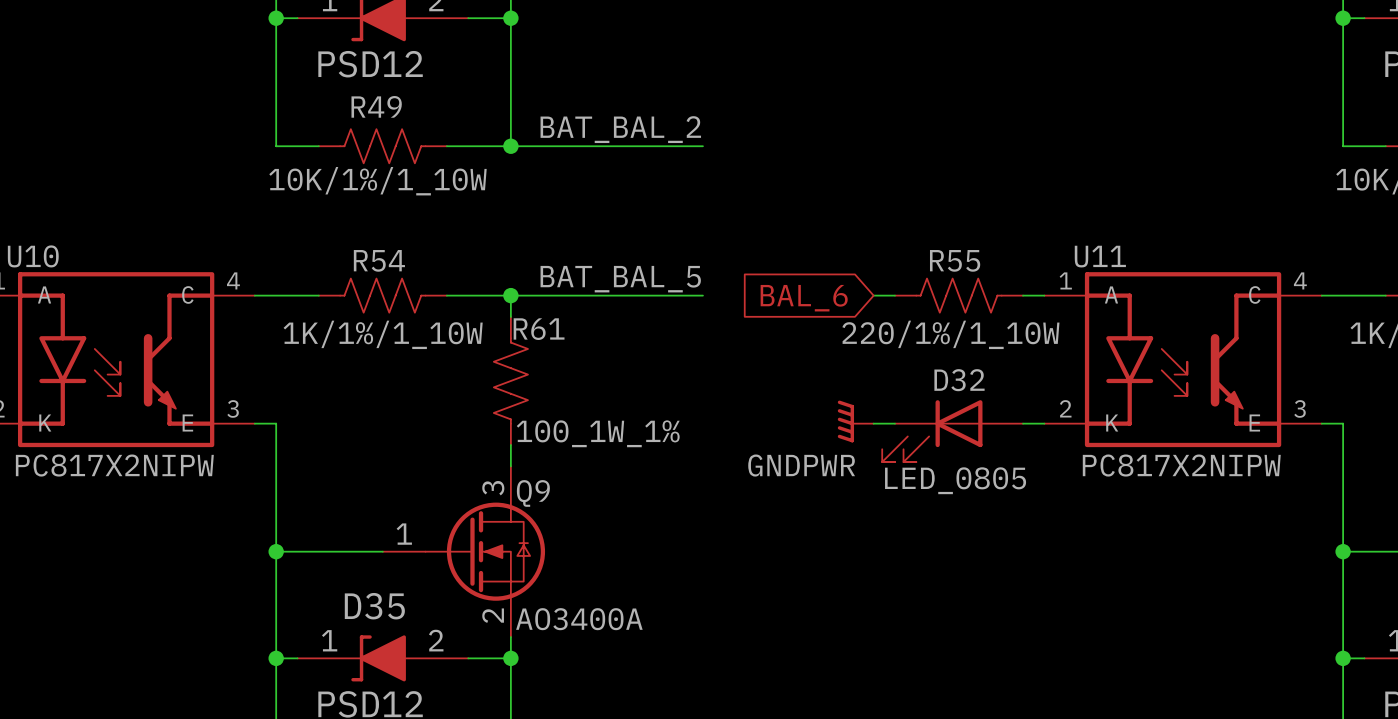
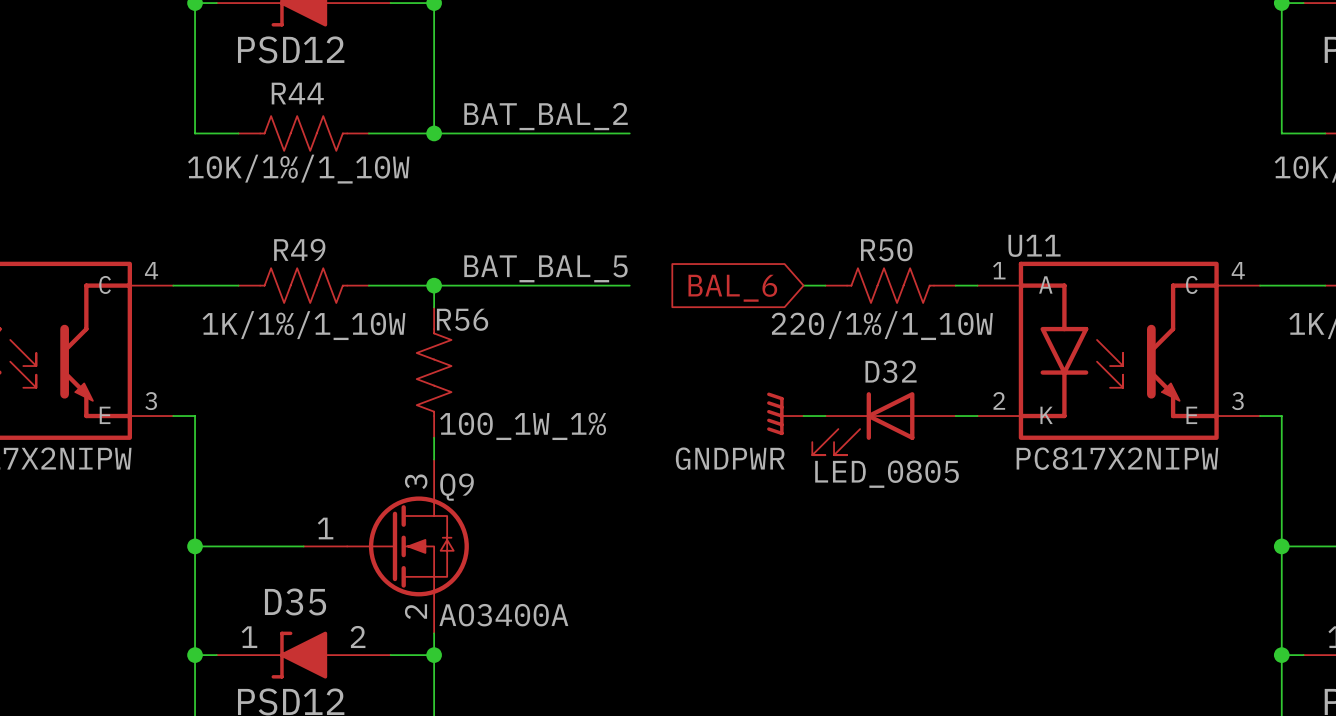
R49 name: R49 (376, 106) -> R44 (297, 93)
R54 name: R54 (379, 260) -> R49 (299, 249)
R55 name: R55 (955, 260) -> R50 (886, 250)
R61 name: R61 (539, 329) -> R56 (462, 319)

